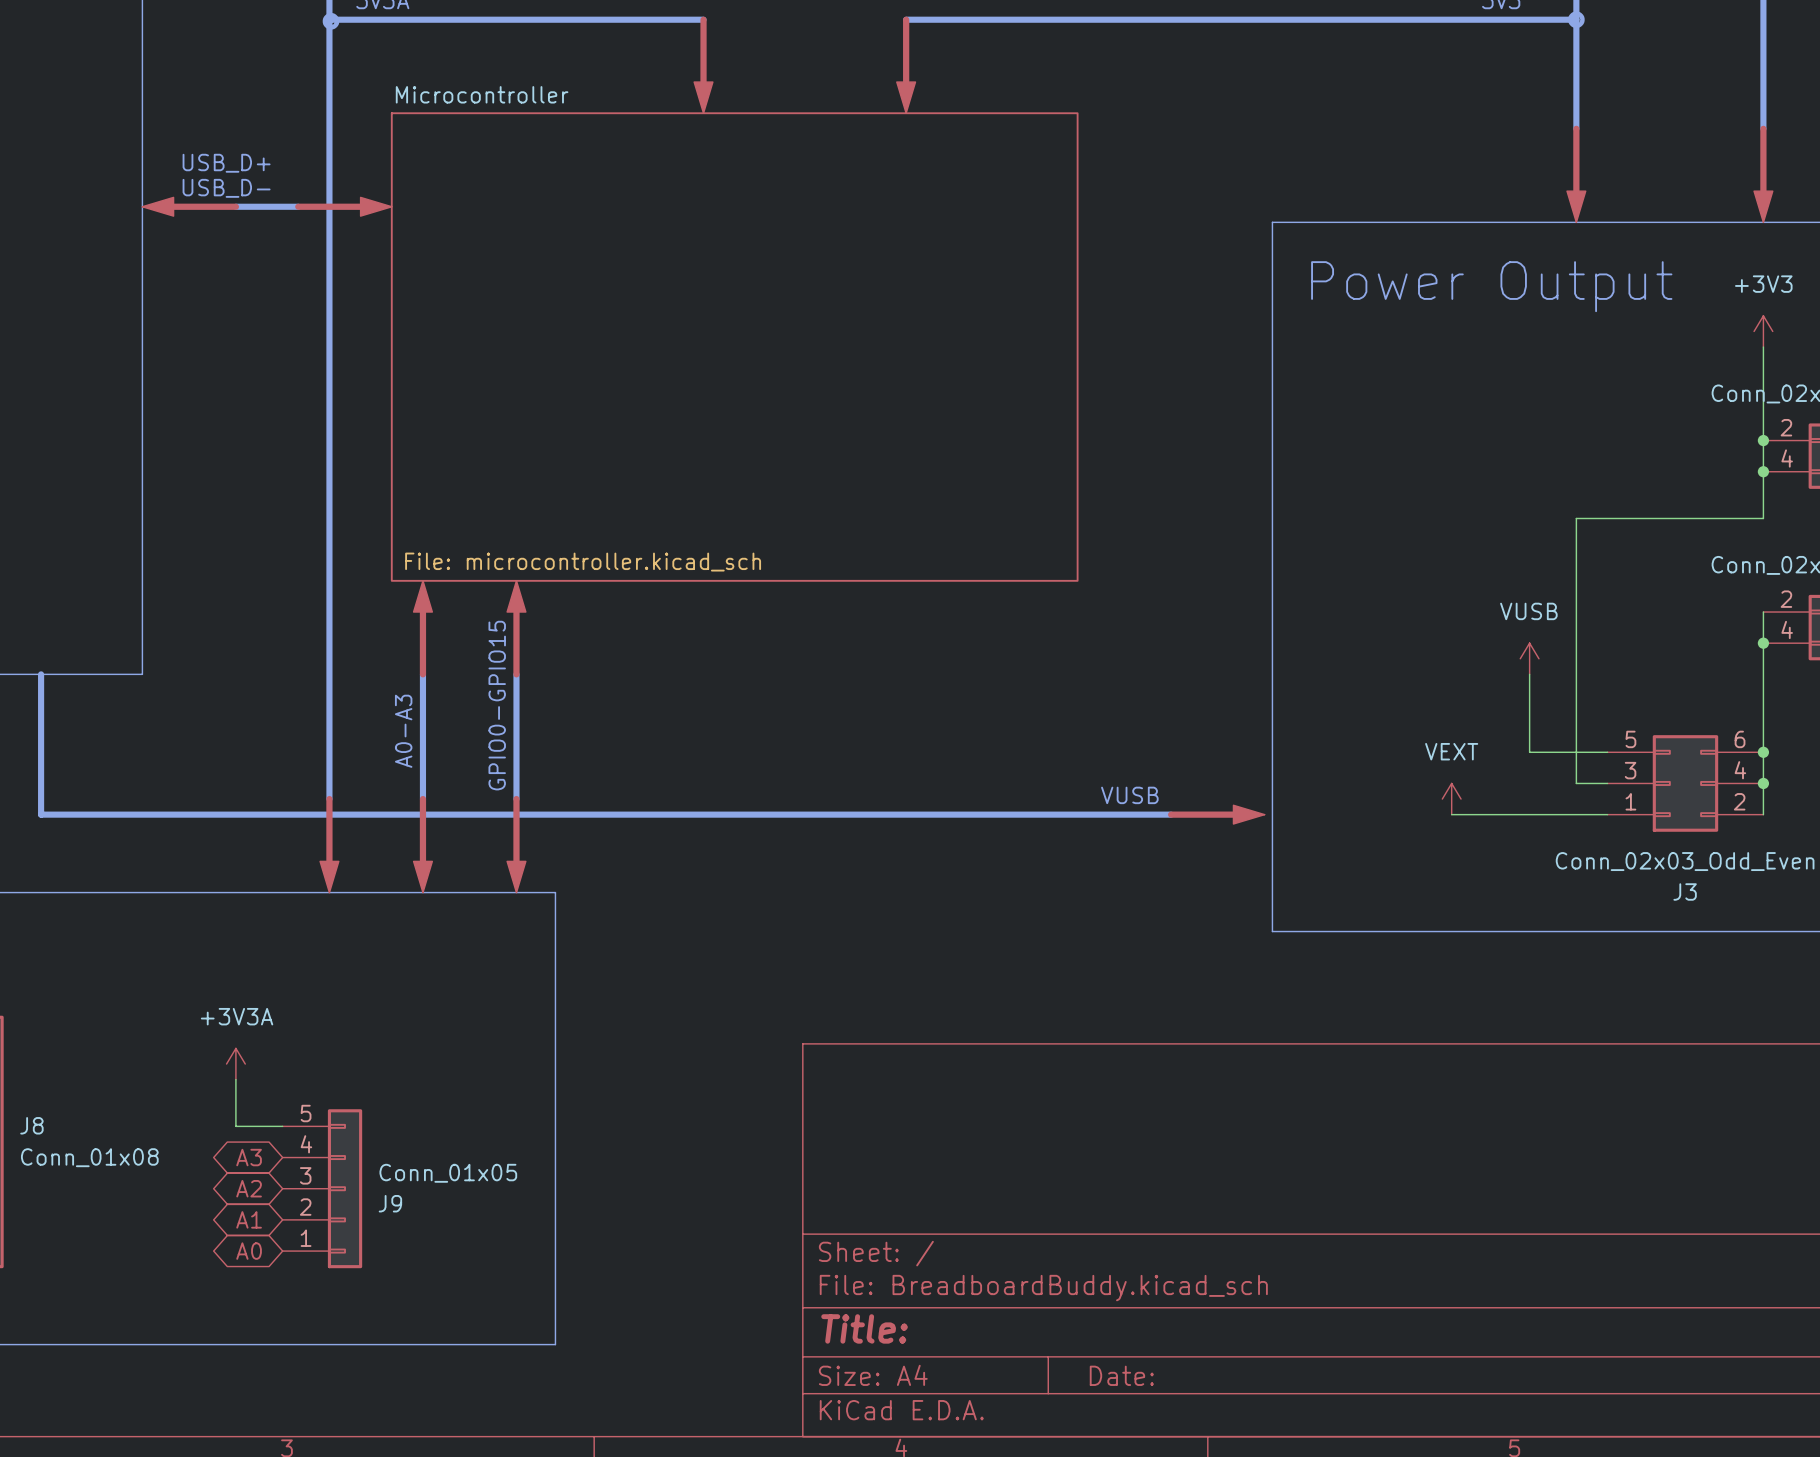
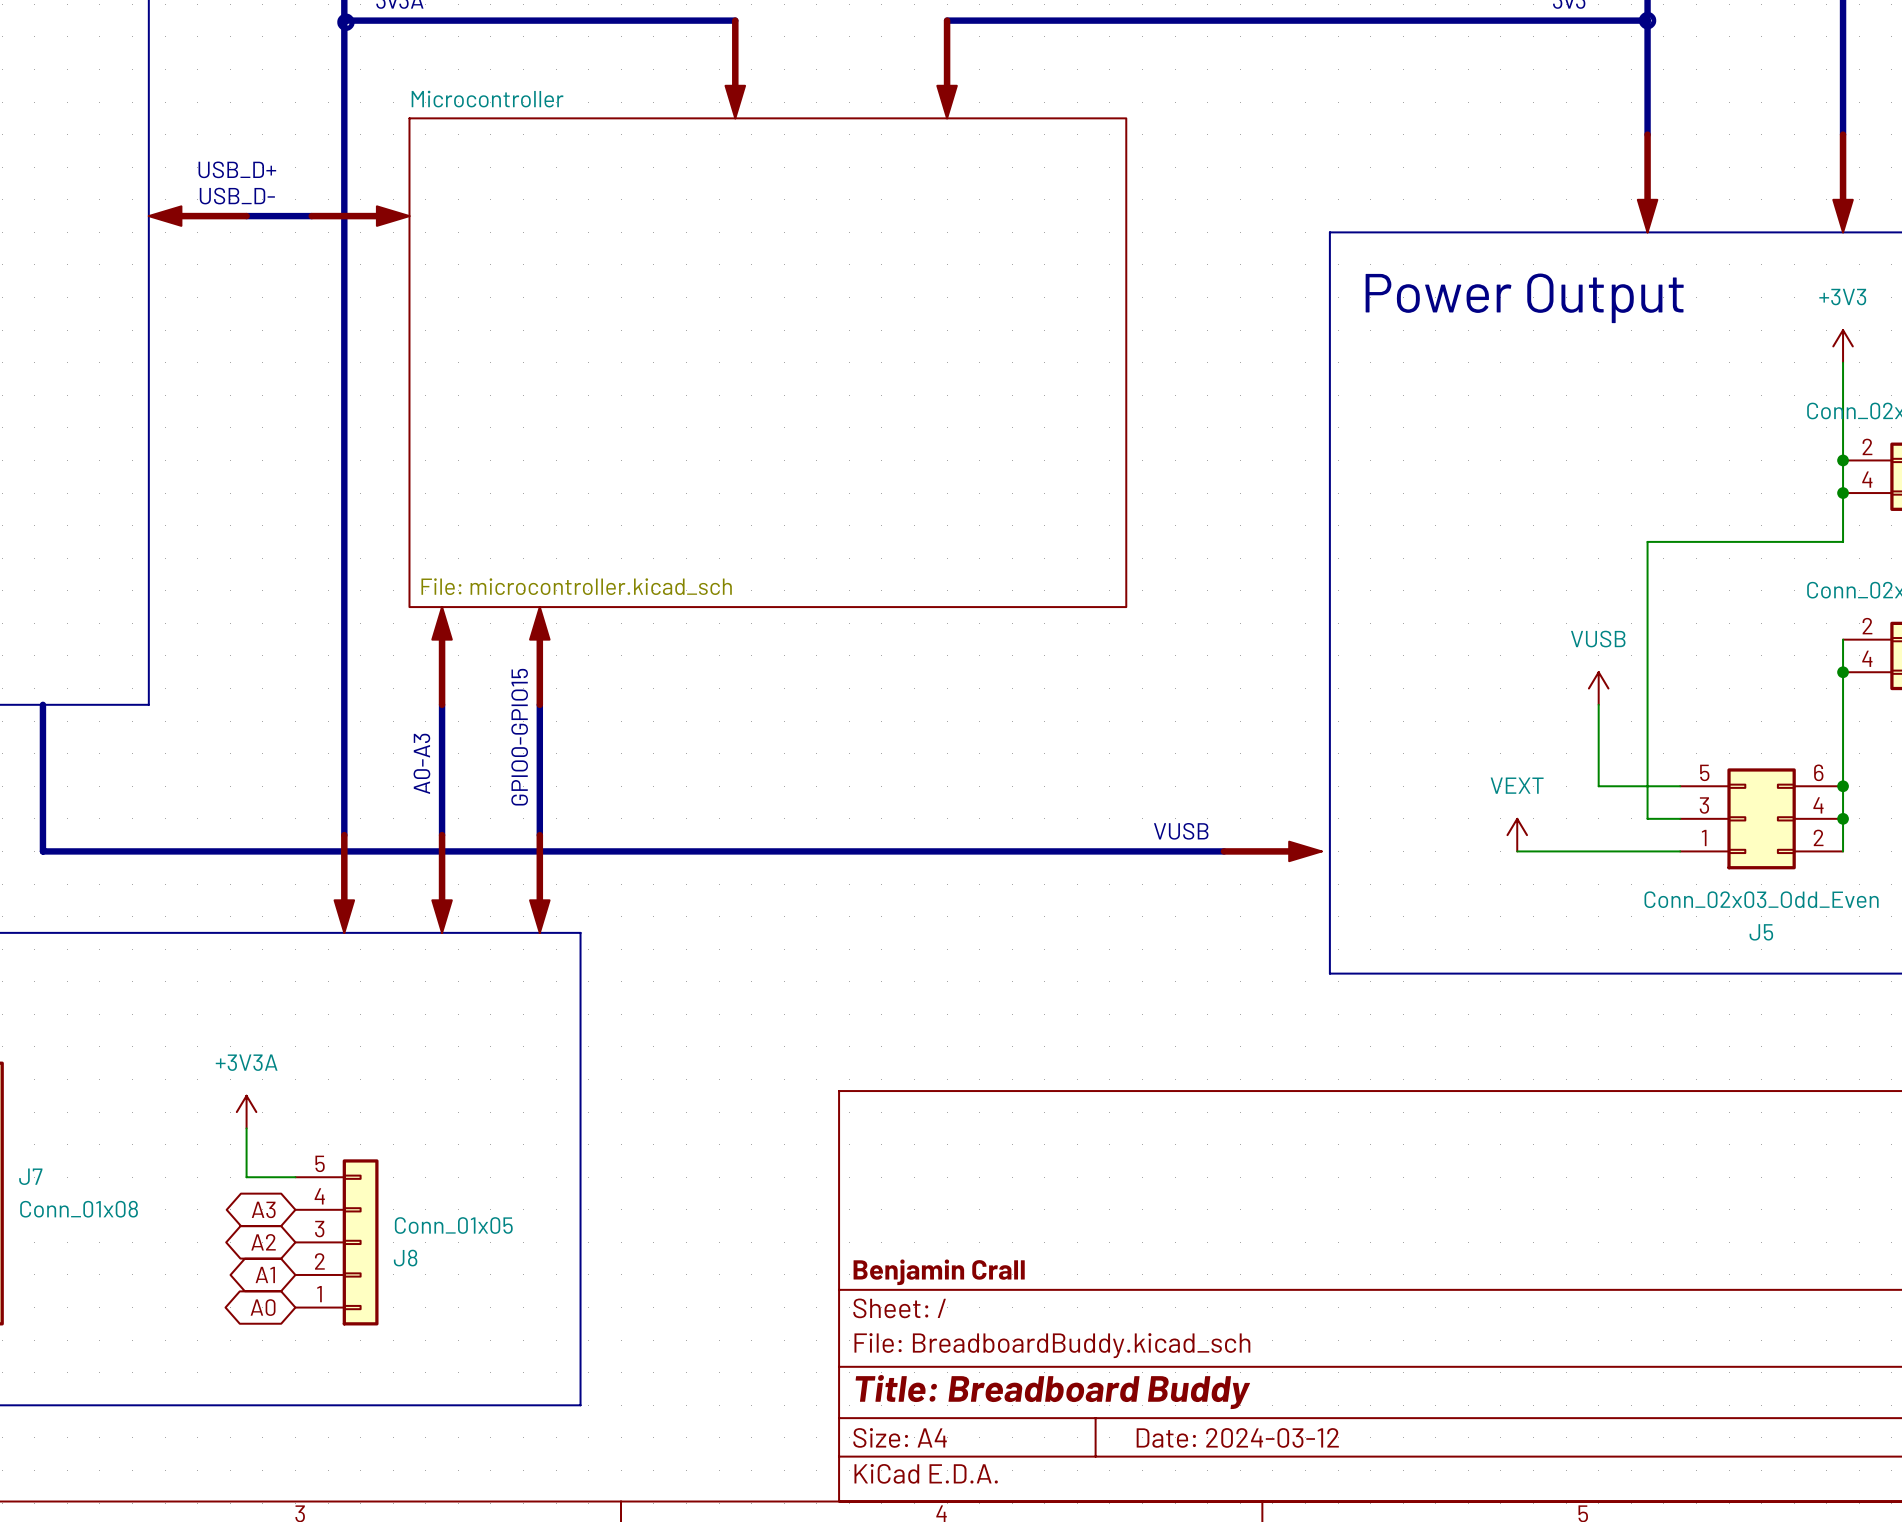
J3 name: J3 (1685, 891) -> J5 (1761, 932)
J8 name: J8 (31, 1125) -> J7 (30, 1176)
J9 name: J9 (390, 1203) -> J8 (405, 1258)
title block: none -> Benjamin Crall (939, 1272)
title block: Title: (864, 1328) -> Title: Breadboard Buddy (1052, 1392)
title block: Date: (1121, 1375) -> Date: 2024-03-12 (1237, 1437)

